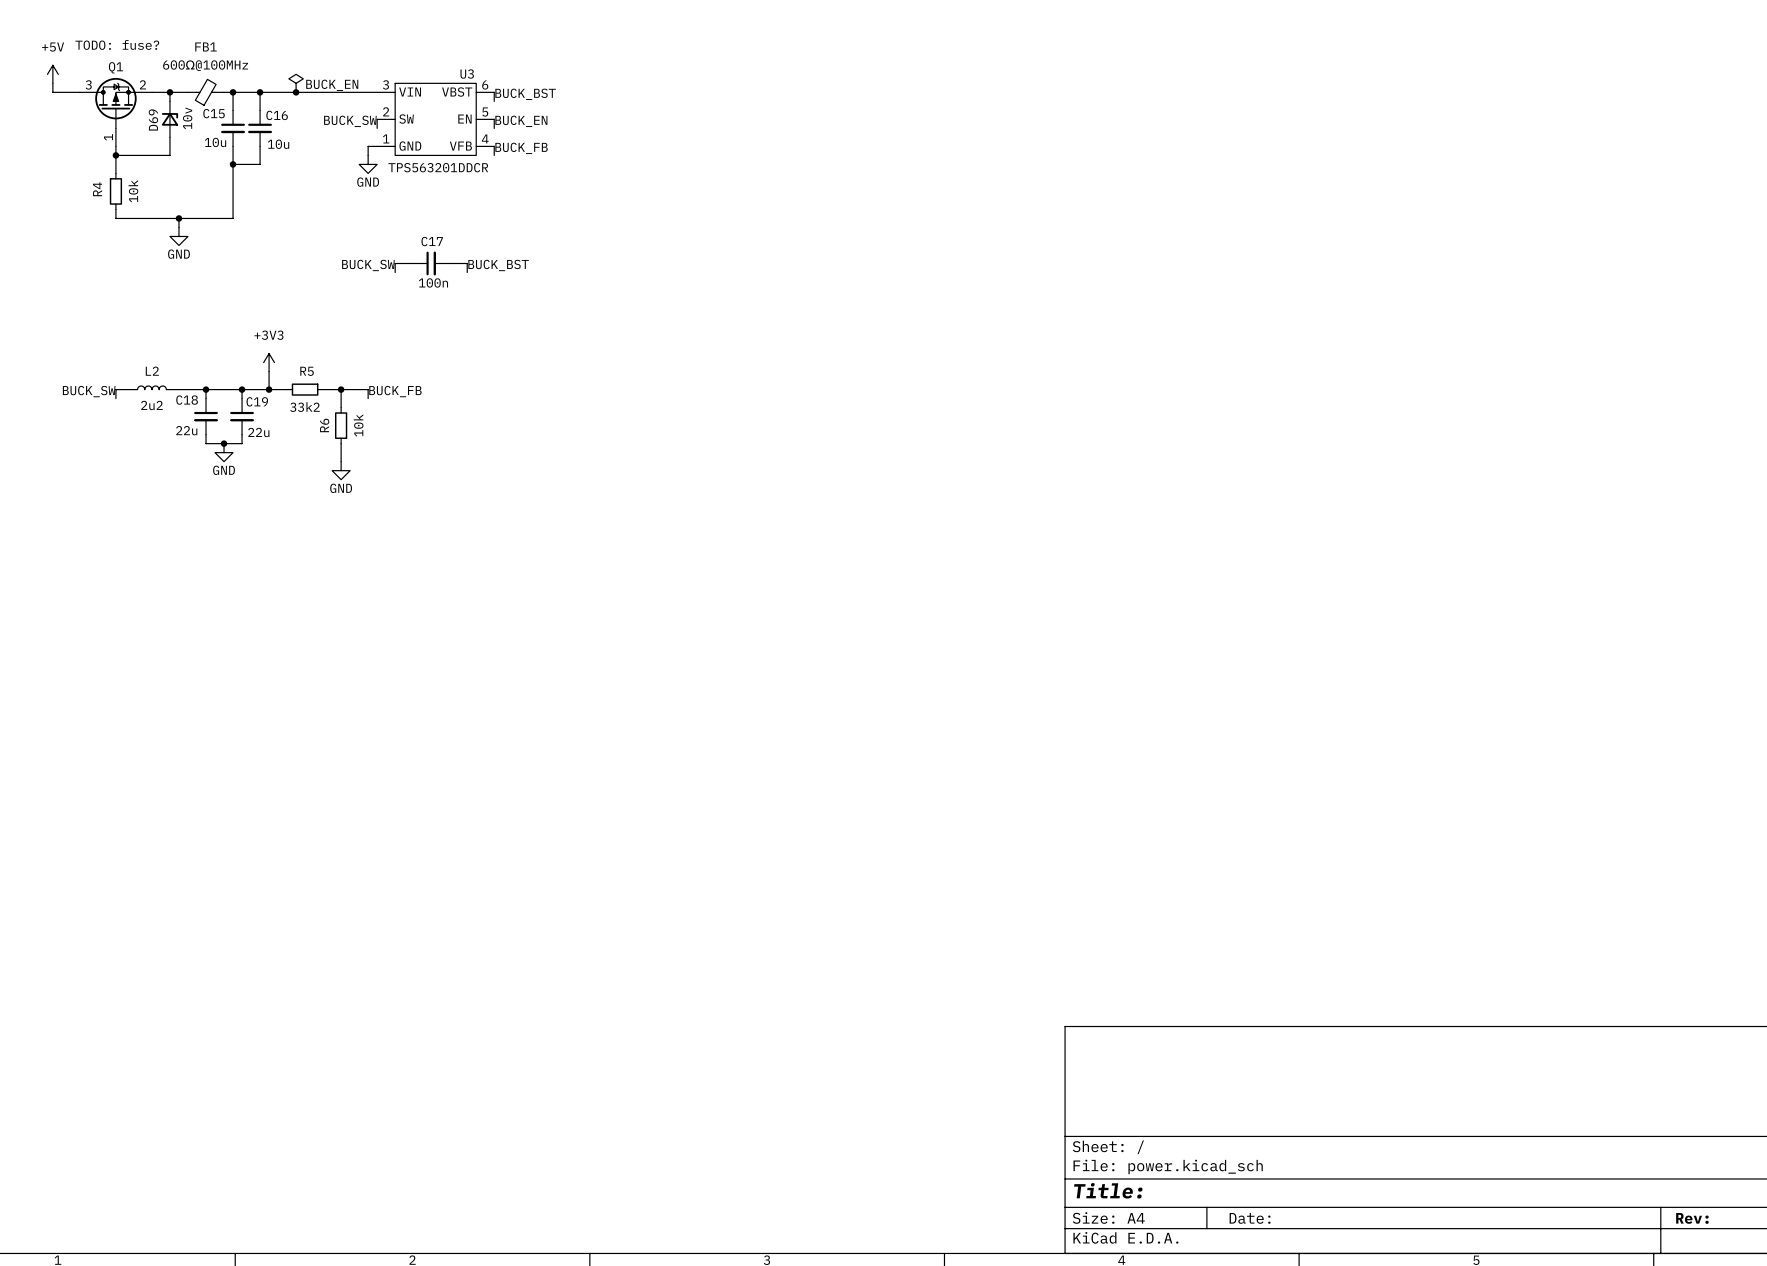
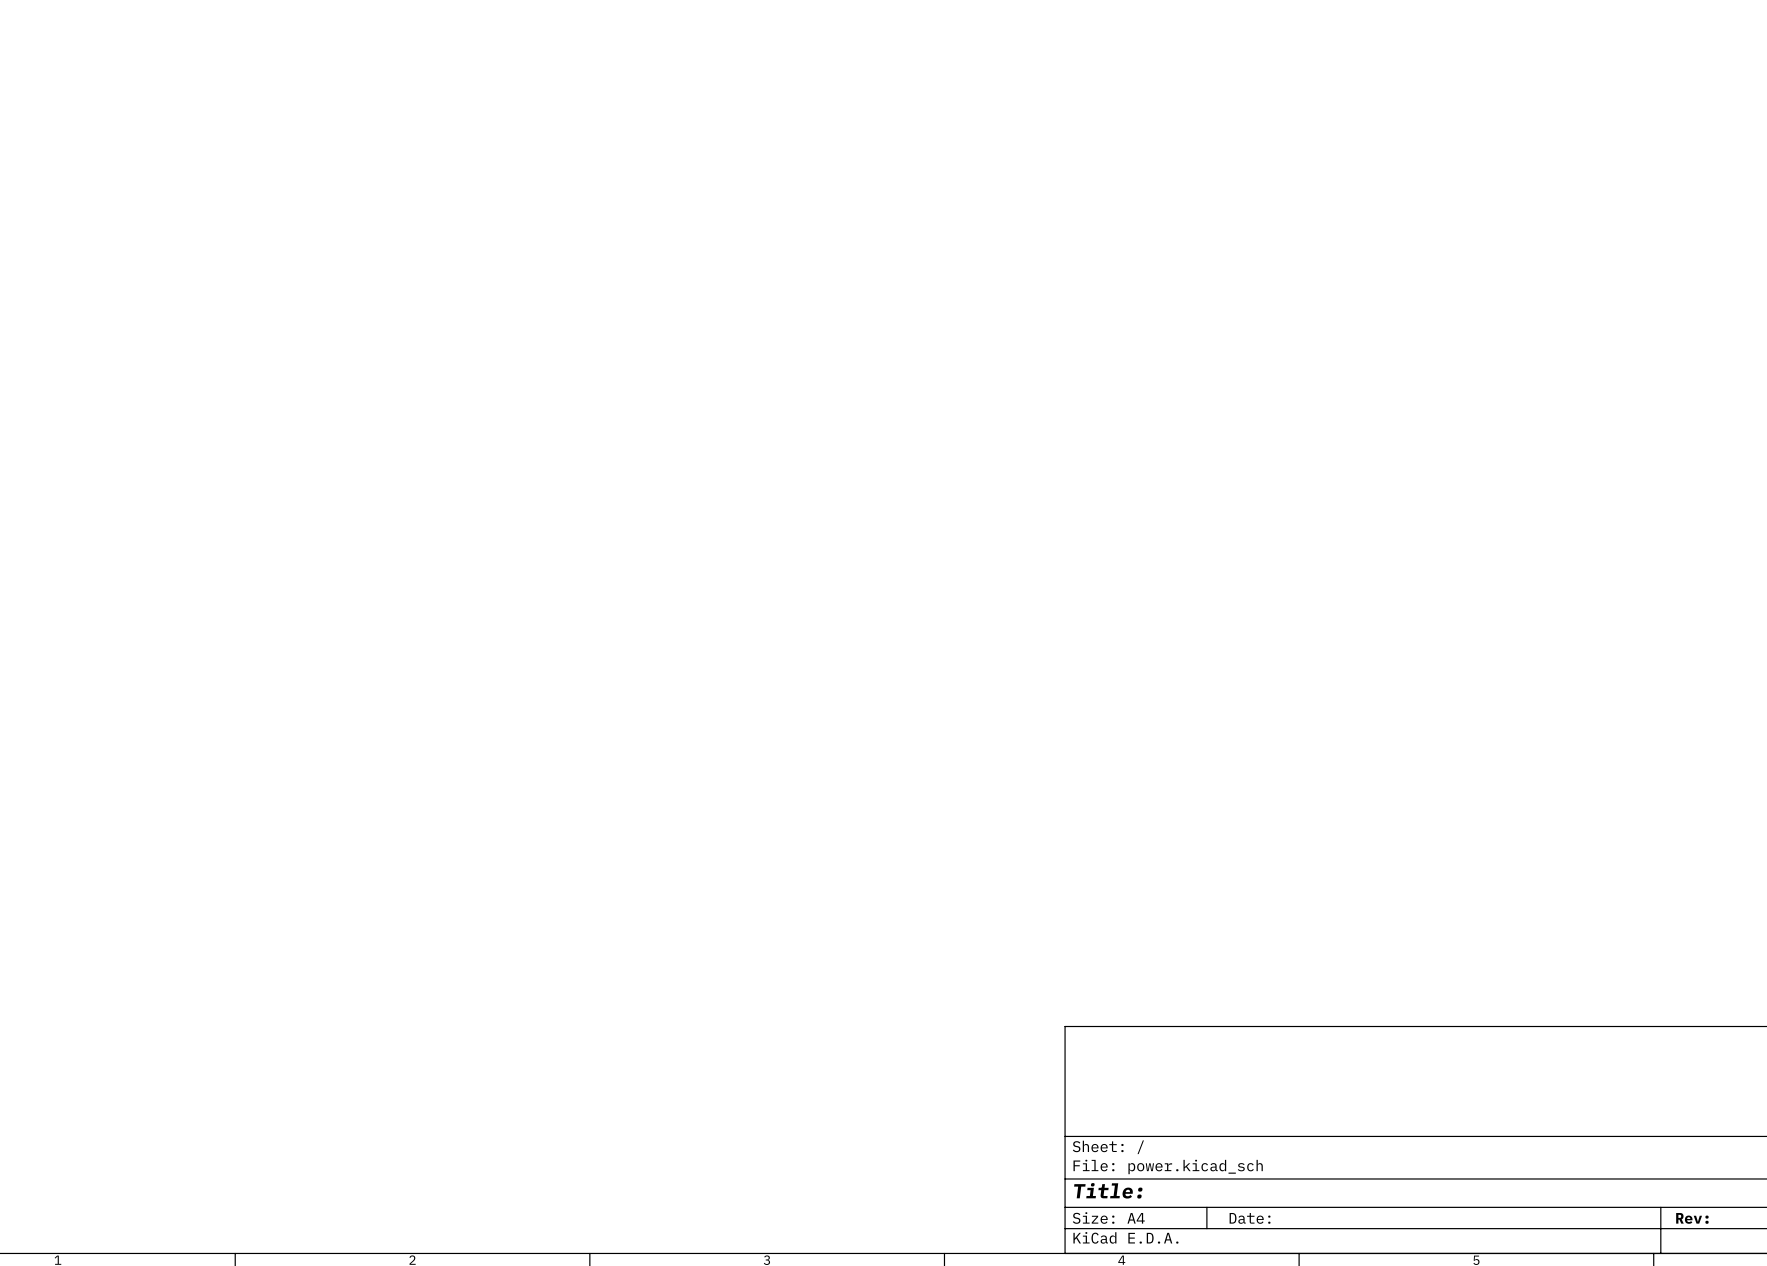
text: TODO: fuse? (117, 45) -> none
power symbol: +5V (52, 74) -> none
wire: (52, 83) (52, 92) (79, 92) -> none
power symbol: (296, 83) -> none
label: BUCK_EN (332, 85) -> none
wire: (151, 92) (187, 92) -> none
wire: (169, 92) (169, 101) -> none
junction: (169, 92) -> none
FB1: 600Ω@100MHz (206, 92) -> none
wire: (224, 92) (377, 92) -> none
wire: (233, 92) (233, 110) -> none
junction: (233, 92) -> none
wire: (260, 92) (260, 110) -> none
junction: (260, 92) -> none
junction: (296, 92) -> none
wire: (494, 92) (494, 101) -> none
label: BUCK_BST (525, 94) -> none
Q1: (115, 112) -> none
D69: 10v (169, 119) -> none
wire: (377, 119) (377, 128) -> none
U3: (435, 119) -> none
wire: (494, 119) (494, 128) -> none
label: BUCK_SW (350, 121) -> none
label: BUCK_EN (521, 121) -> none
C15: 10u (233, 128) -> none
C16: 10u (260, 128) -> none
wire: (169, 137) (169, 155) (115, 155) -> none
wire: (115, 146) (115, 173) -> none
wire: (233, 146) (233, 218) (115, 218) (115, 209) -> none
wire: (260, 146) (260, 164) (233, 164) -> none
wire: (377, 146) (368, 146) (368, 155) -> none
wire: (494, 146) (494, 155) -> none
label: BUCK_FB (521, 148) -> none
junction: (115, 155) -> none
junction: (233, 164) -> none
power symbol: GND (368, 164) -> none
R4: 10k (115, 191) -> none
wire: (178, 218) (178, 227) -> none
junction: (178, 218) -> none
power symbol: GND (178, 236) -> none
wire: (413, 263) (395, 263) (395, 272) -> none
C17: 100n (431, 263) -> none
wire: (449, 263) (467, 263) (467, 272) -> none
label: BUCK_SW (368, 265) -> none
label: BUCK_BST (498, 265) -> none
power symbol: +3V3 (269, 362) -> none
wire: (269, 371) (269, 389) -> none
L2: 2u2 (151, 387) -> none
wire: (133, 389) (115, 389) (115, 398) -> none
wire: (169, 389) (287, 389) -> none
wire: (206, 389) (206, 398) -> none
junction: (206, 389) -> none
wire: (242, 389) (242, 398) -> none
junction: (242, 389) -> none
junction: (269, 389) -> none
R5: 33k2 (305, 389) -> none
wire: (323, 389) (368, 389) (368, 398) -> none
wire: (341, 389) (341, 407) -> none
junction: (341, 389) -> none
label: BUCK_SW (89, 391) -> none
label: BUCK_FB (395, 391) -> none
C18: 22u (206, 416) -> none
C19: 22u (242, 416) -> none
R6: 10k (341, 425) -> none
wire: (206, 434) (206, 443) (242, 443) (242, 434) -> none
junction: (224, 443) -> none
wire: (341, 443) (341, 461) -> none
power symbol: GND (224, 452) -> none
power symbol: GND (341, 470) -> none

